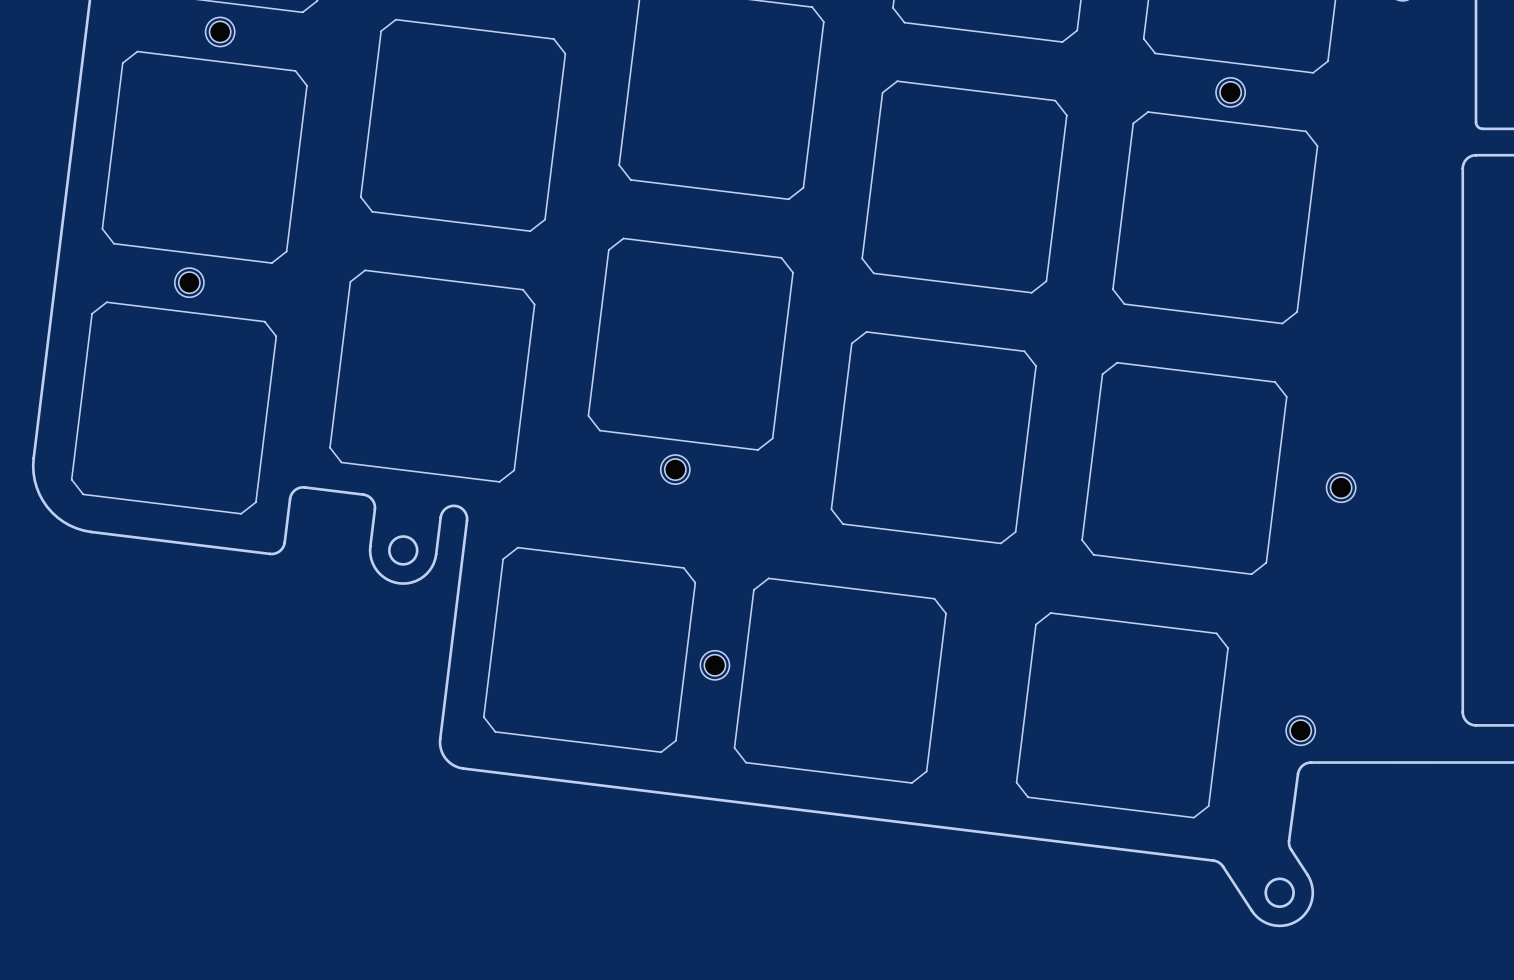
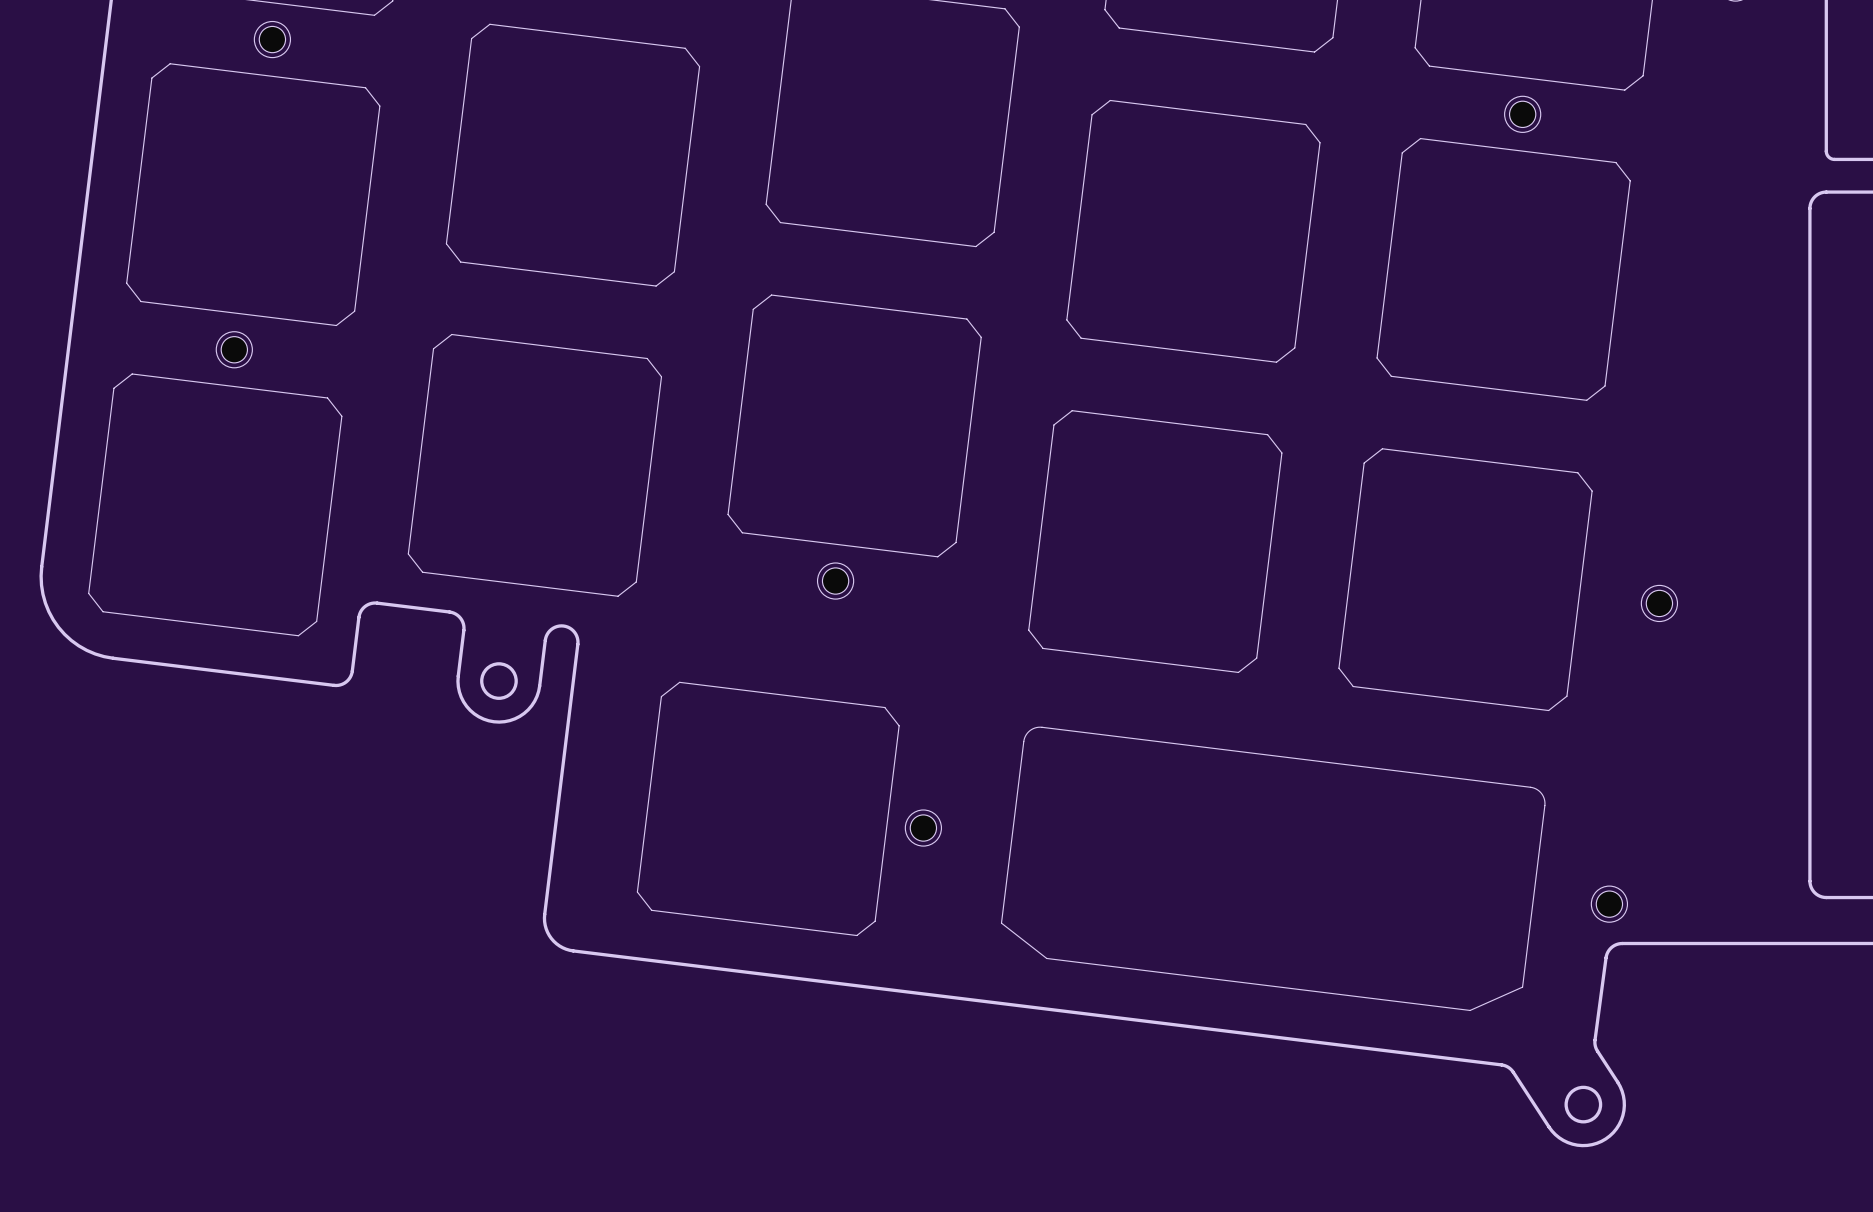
drawing: [734, 578, 947, 784] -> none
drawing: none -> [1001, 726, 1546, 1011]
drawing: [1016, 612, 1229, 818] -> none
drawing position: (589, 649) -> (768, 808)
part position: (714, 665) -> (923, 828)

